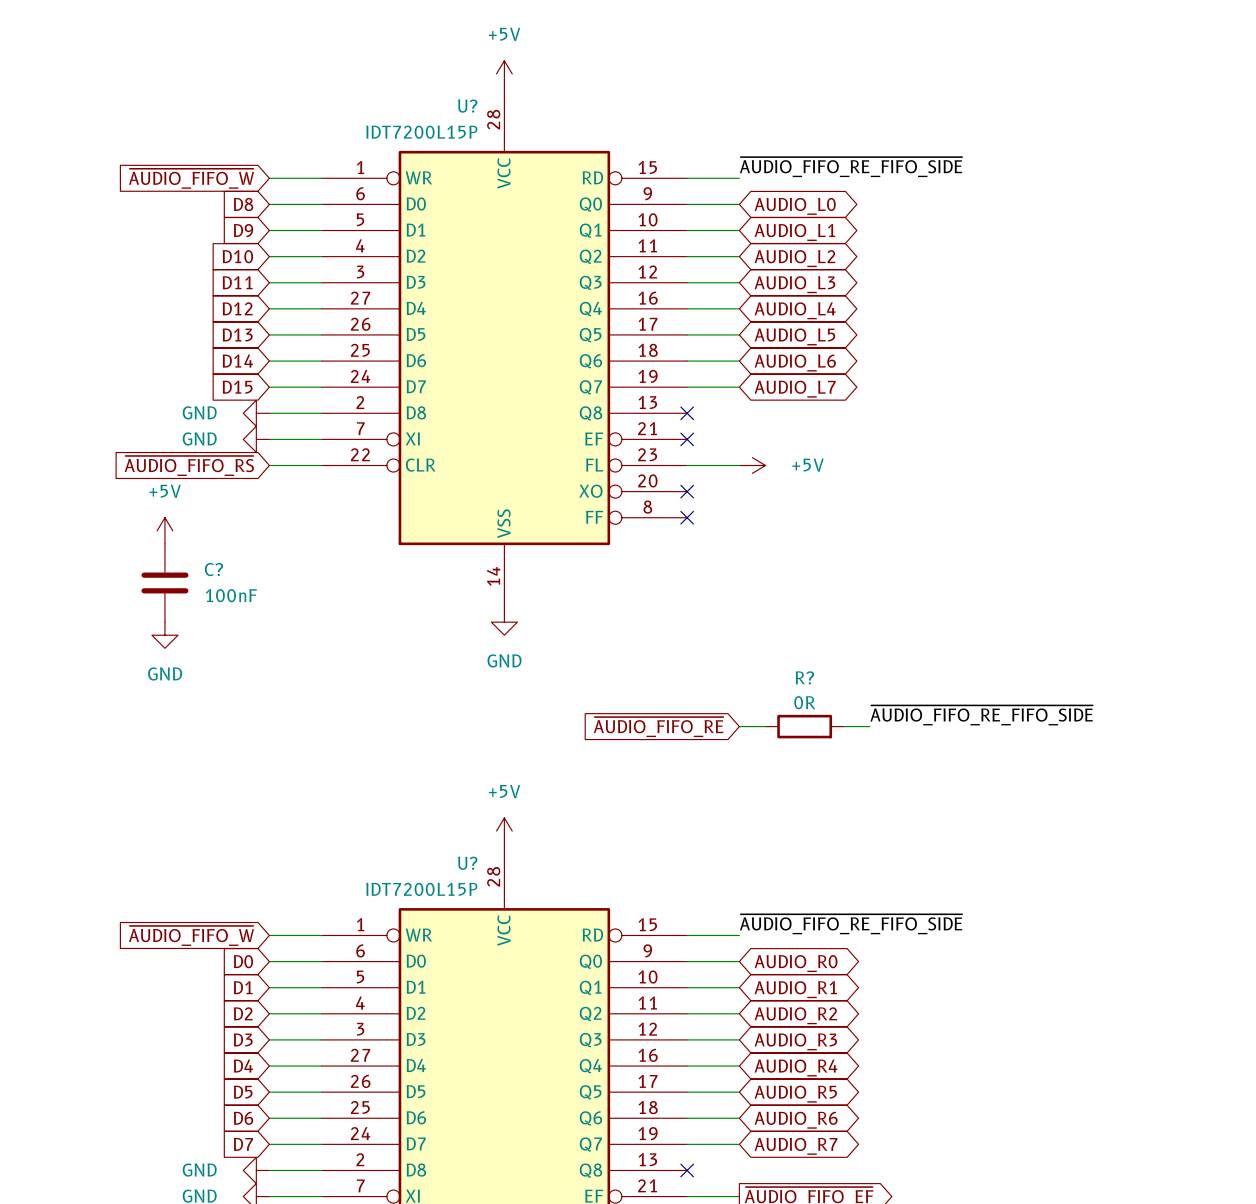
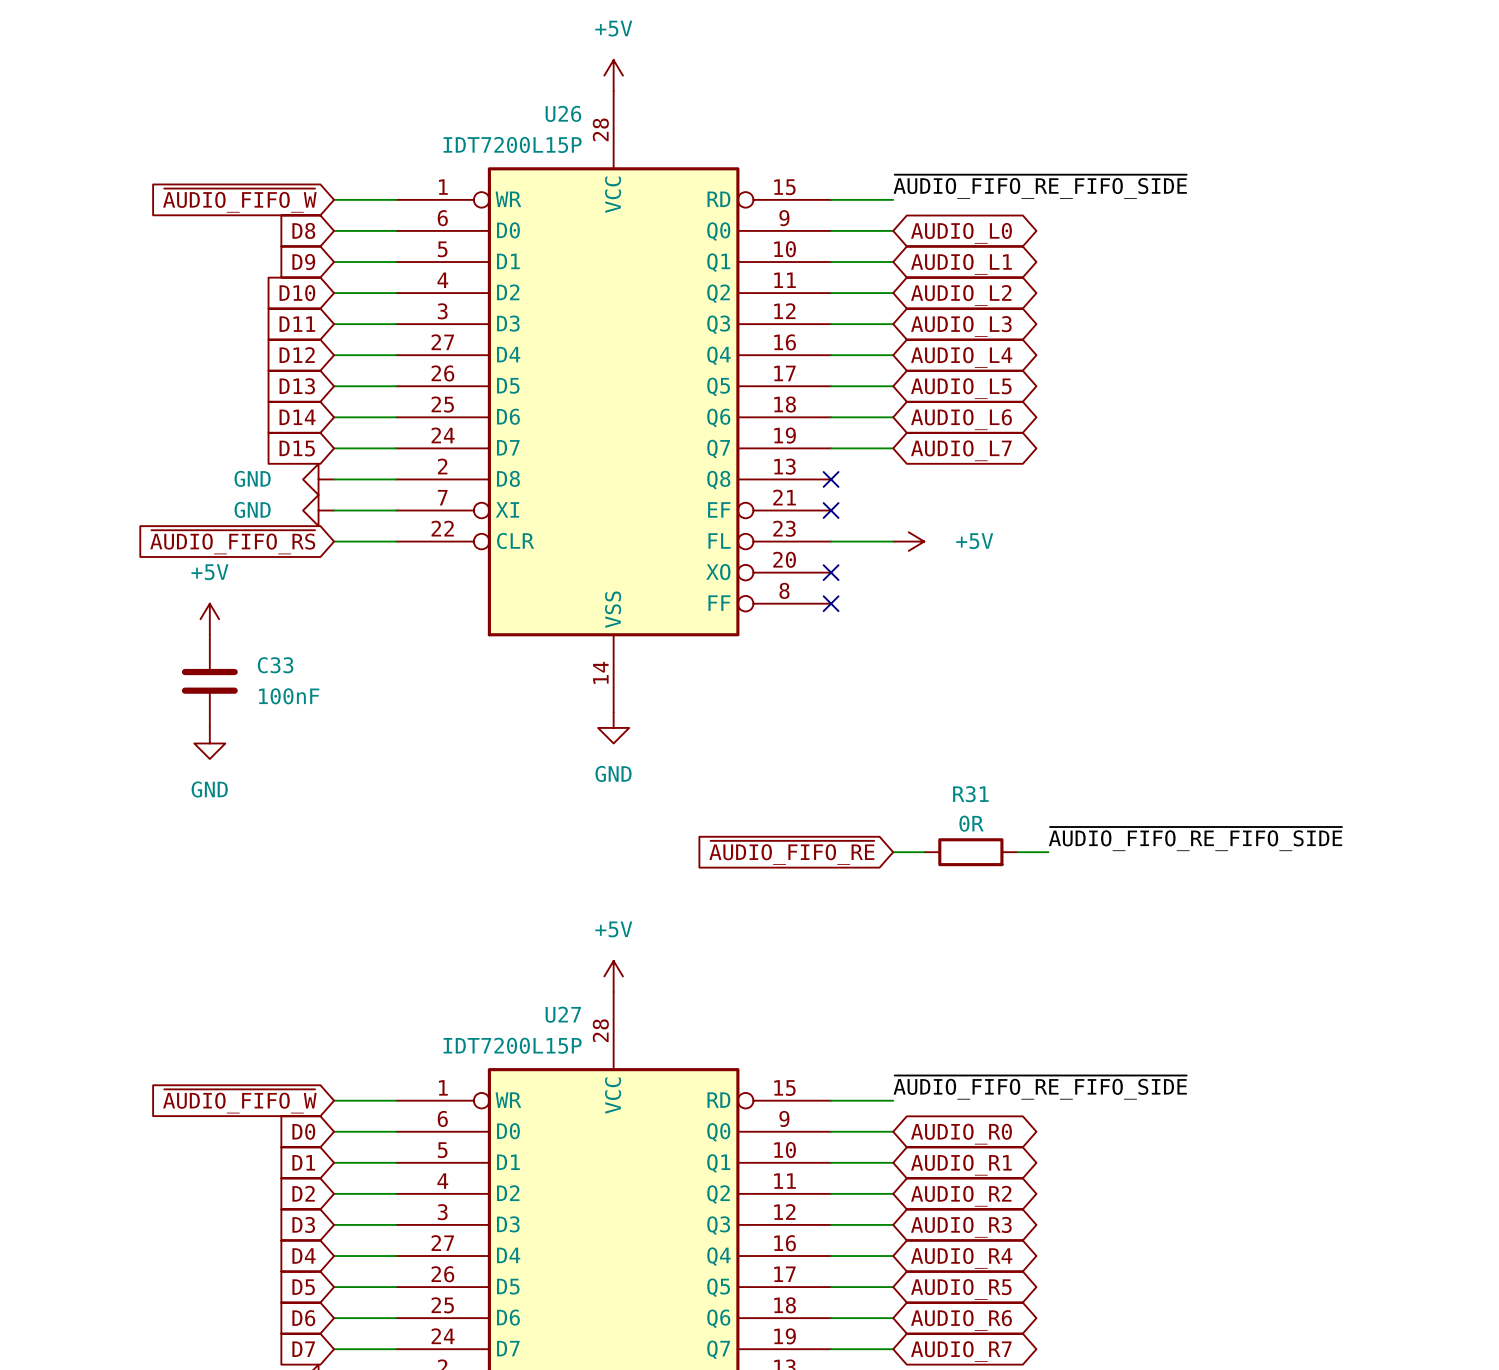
U? name: U? (467, 106) -> U26 (563, 113)
C? name: C? (213, 569) -> C33 (275, 665)
R? name: R? (804, 677) -> R31 (970, 794)
U? name: U? (467, 863) -> U27 (563, 1014)

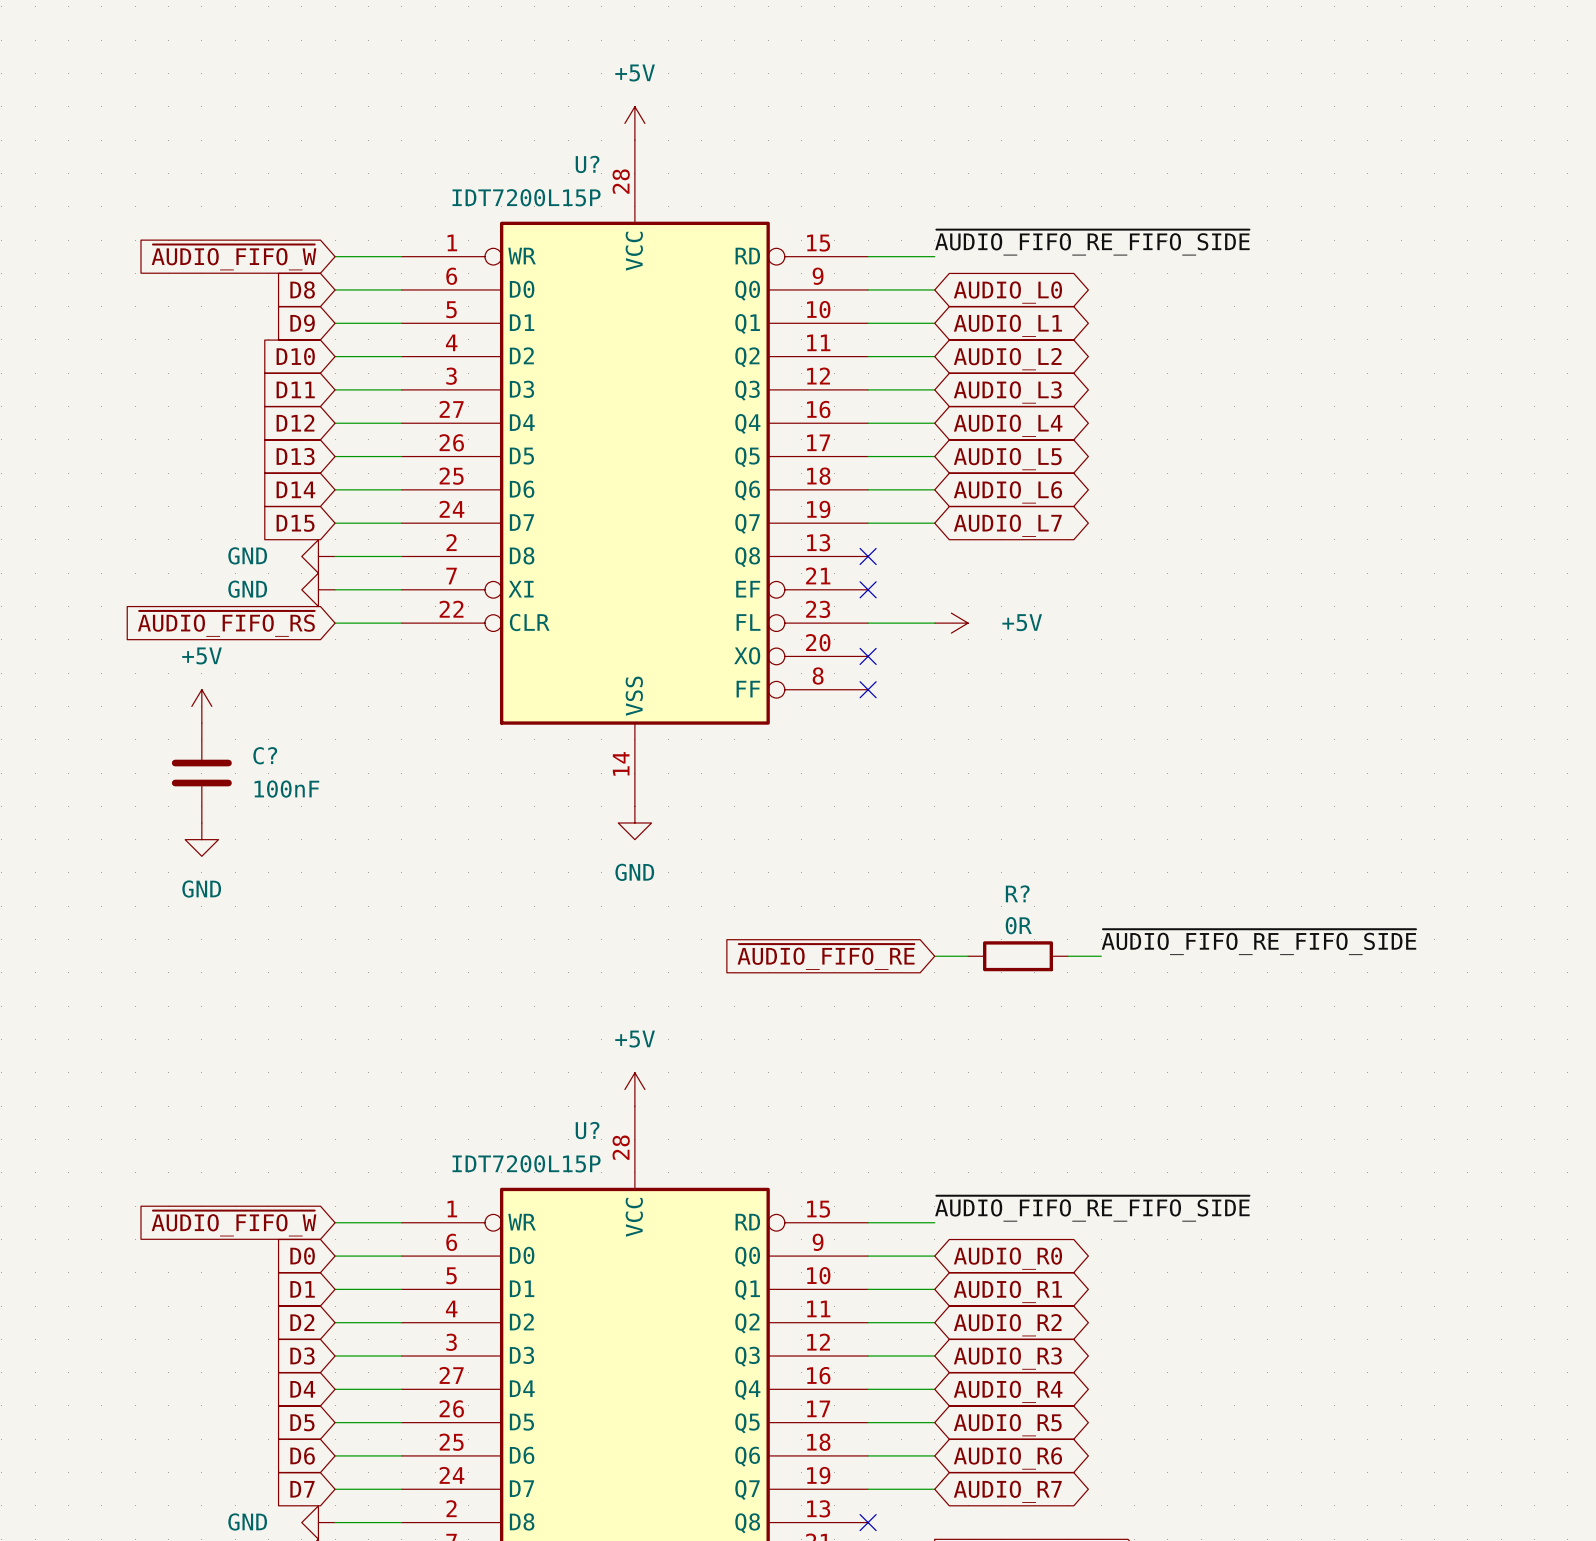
U26 name: U26 (563, 113) -> U? (587, 164)
C33 name: C33 (275, 665) -> C? (265, 755)
R31 name: R31 (970, 794) -> R? (1017, 893)
U27 name: U27 (563, 1014) -> U? (587, 1130)

